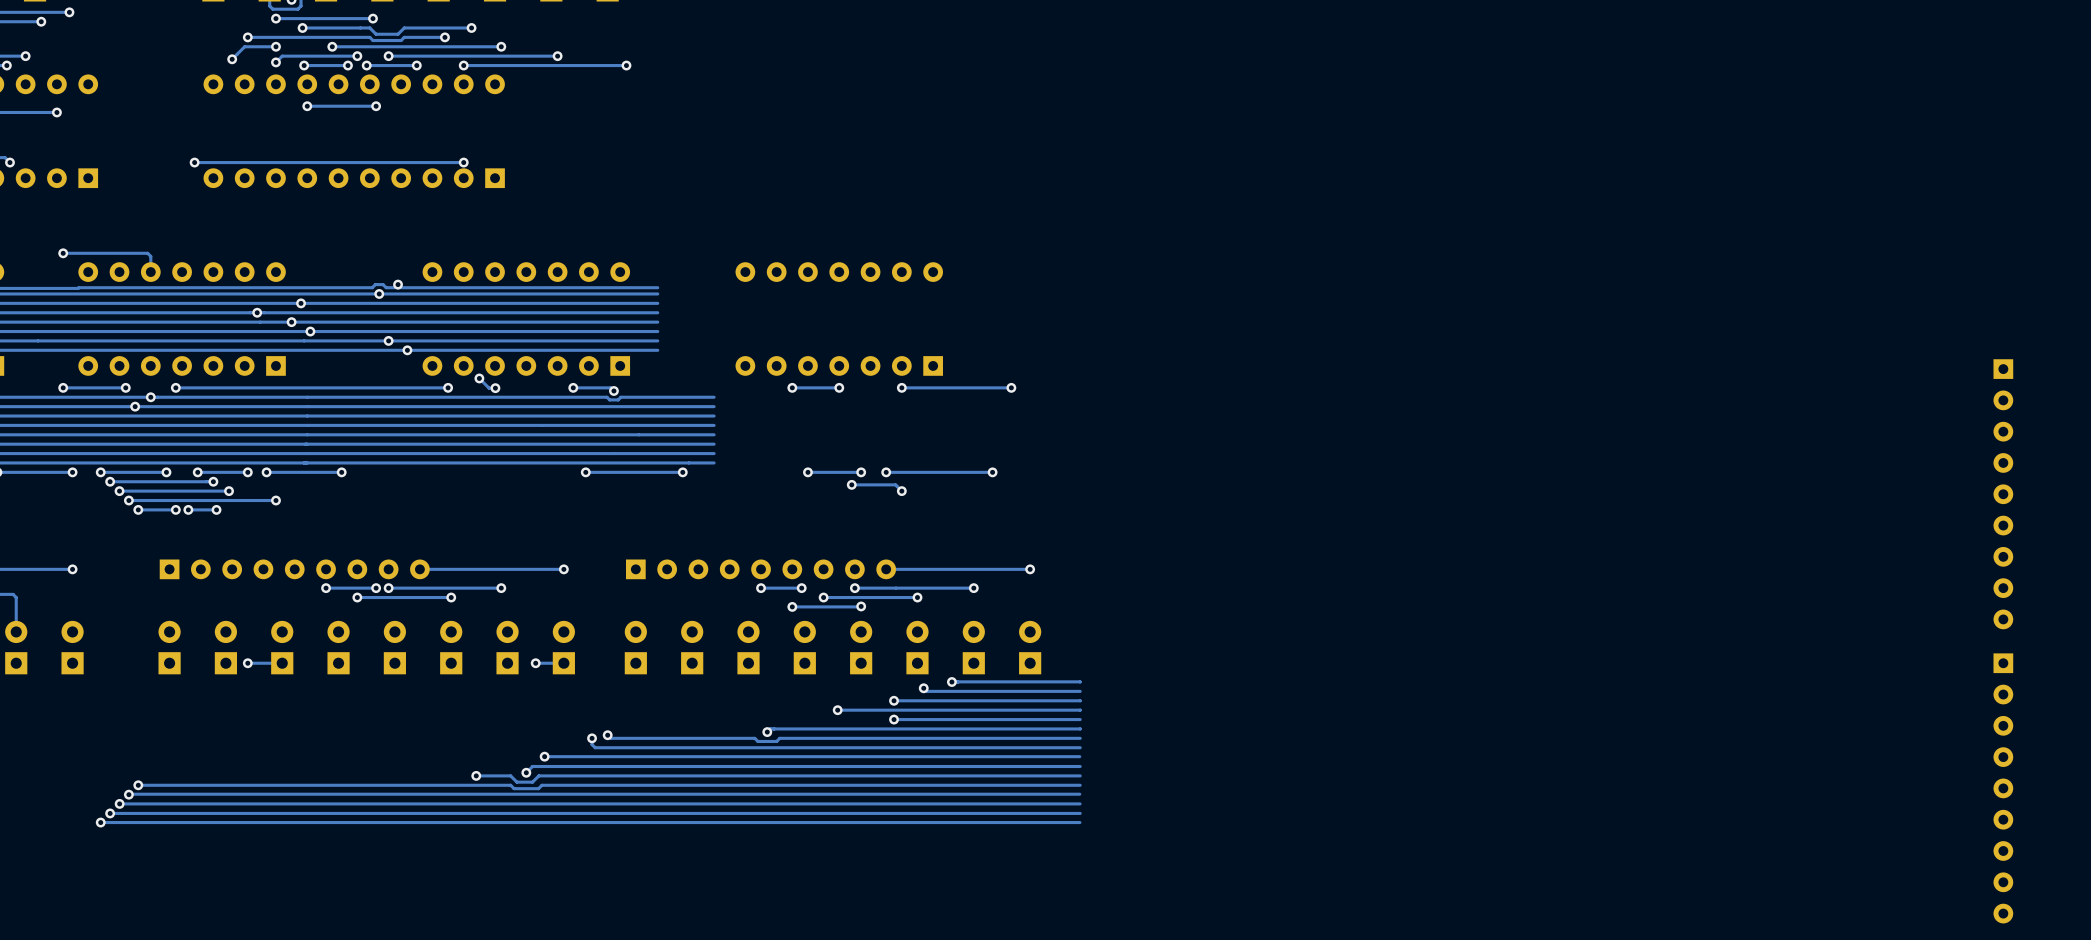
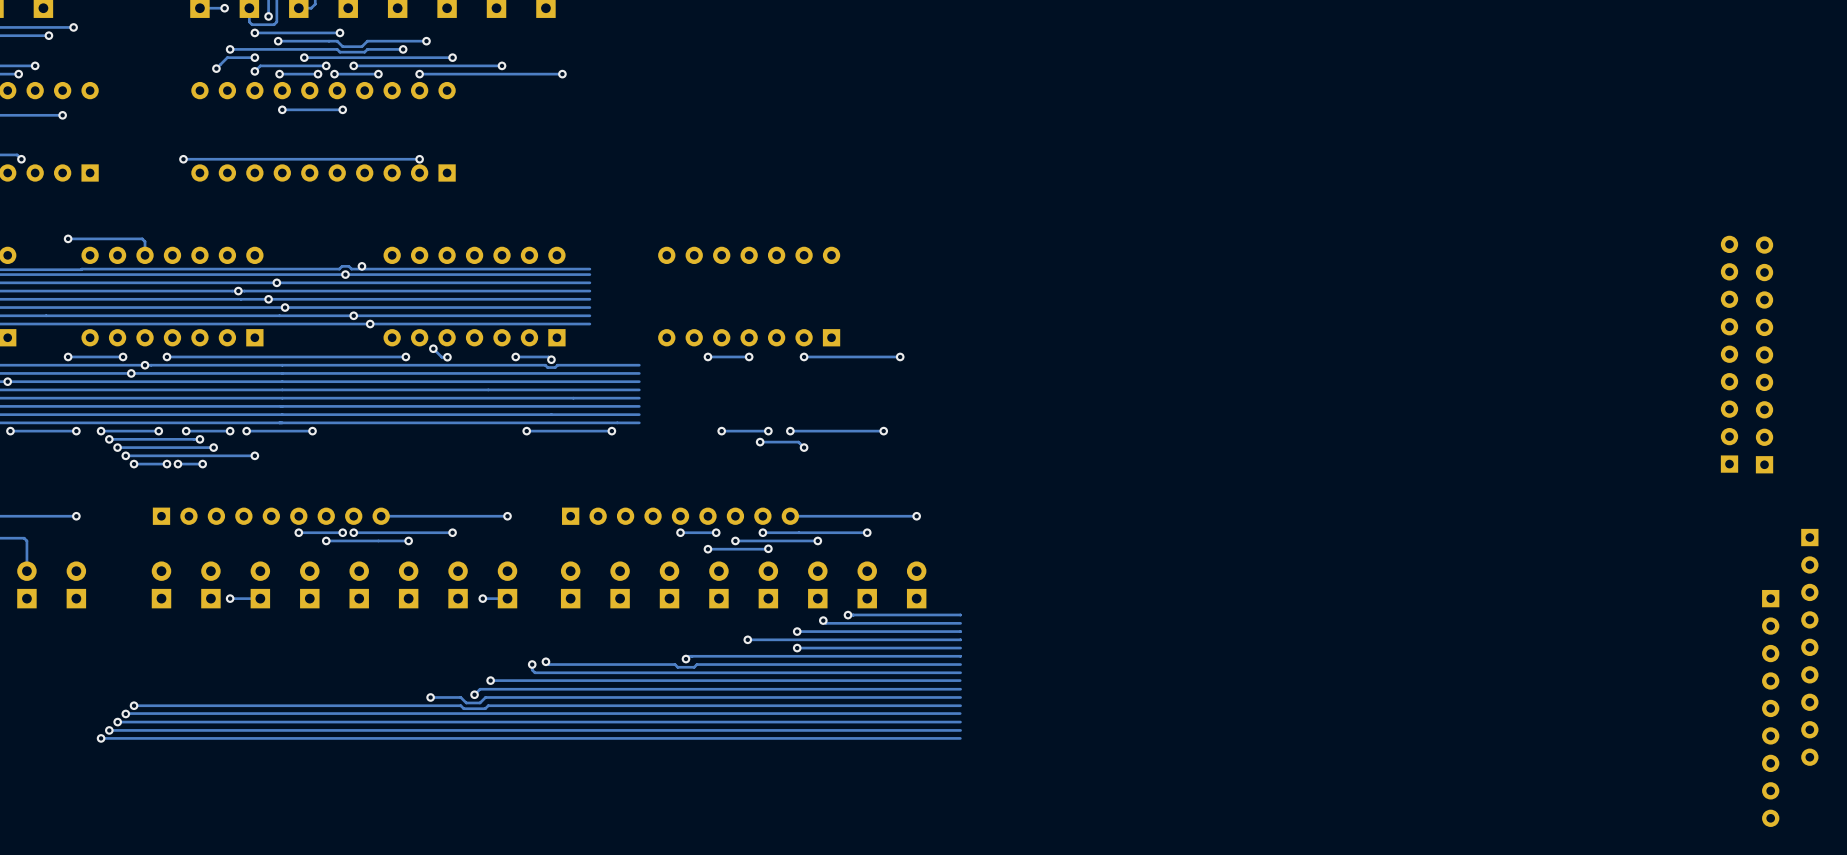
part: none -> (1729, 354)
part: none -> (1764, 354)
part: (2003, 494) -> none
part: none -> (1809, 647)

